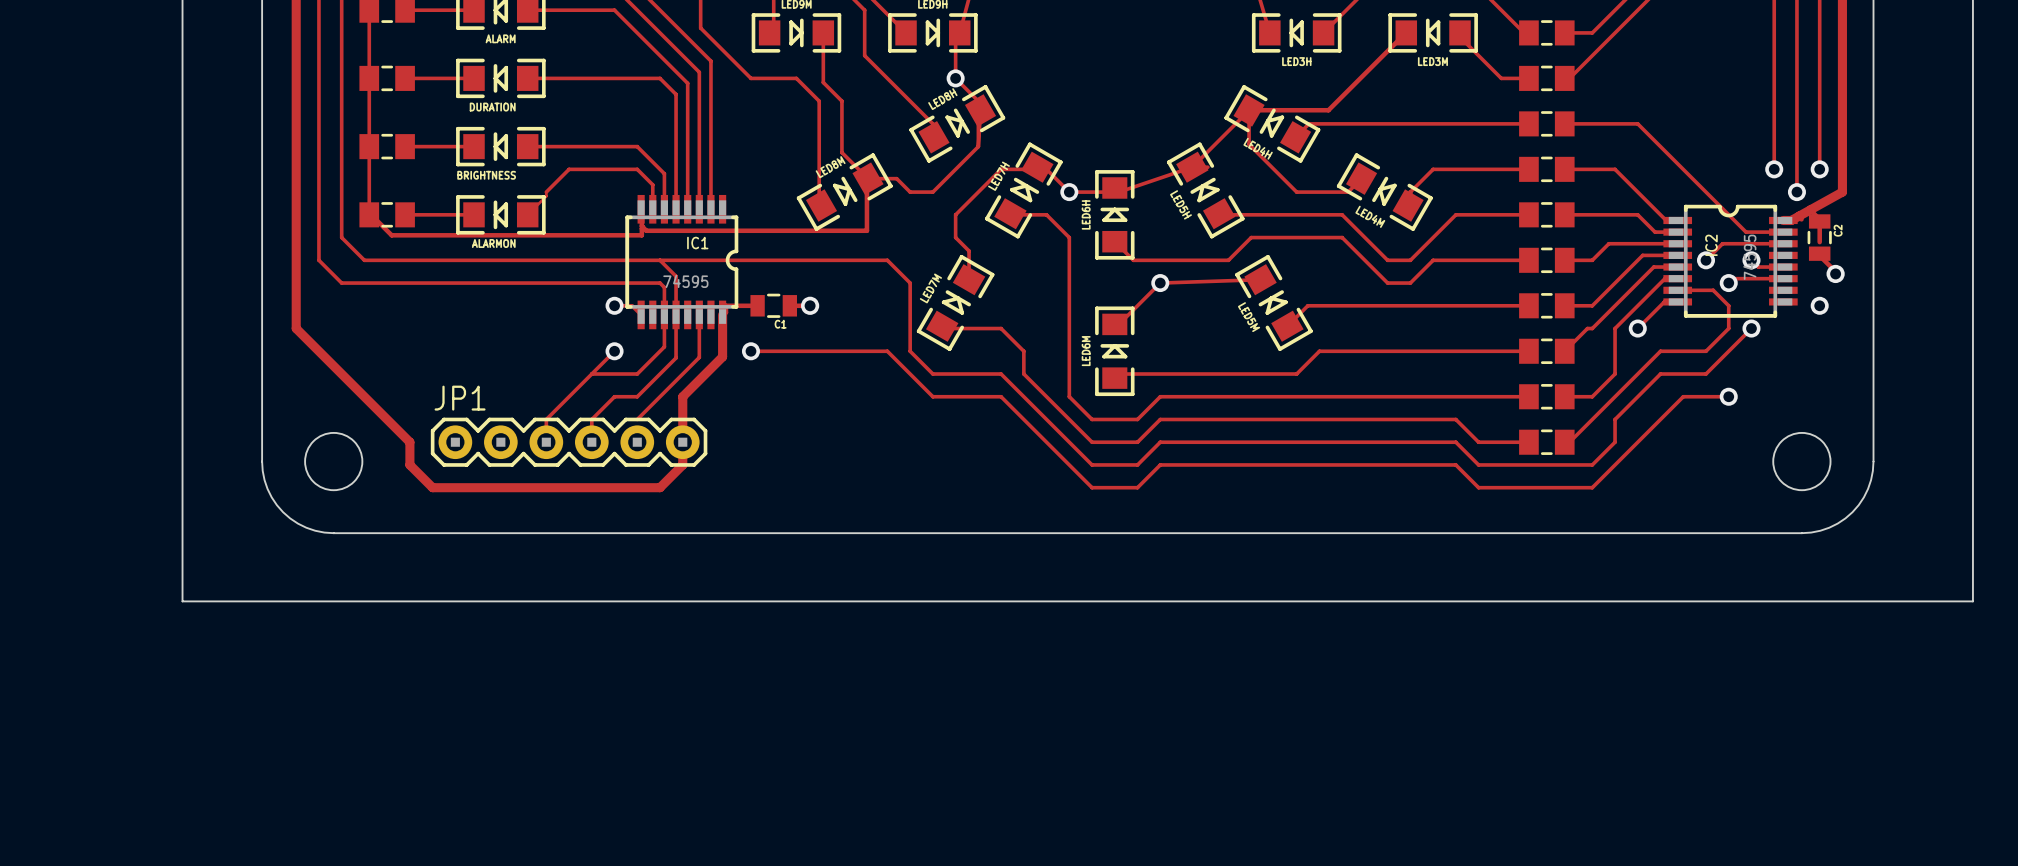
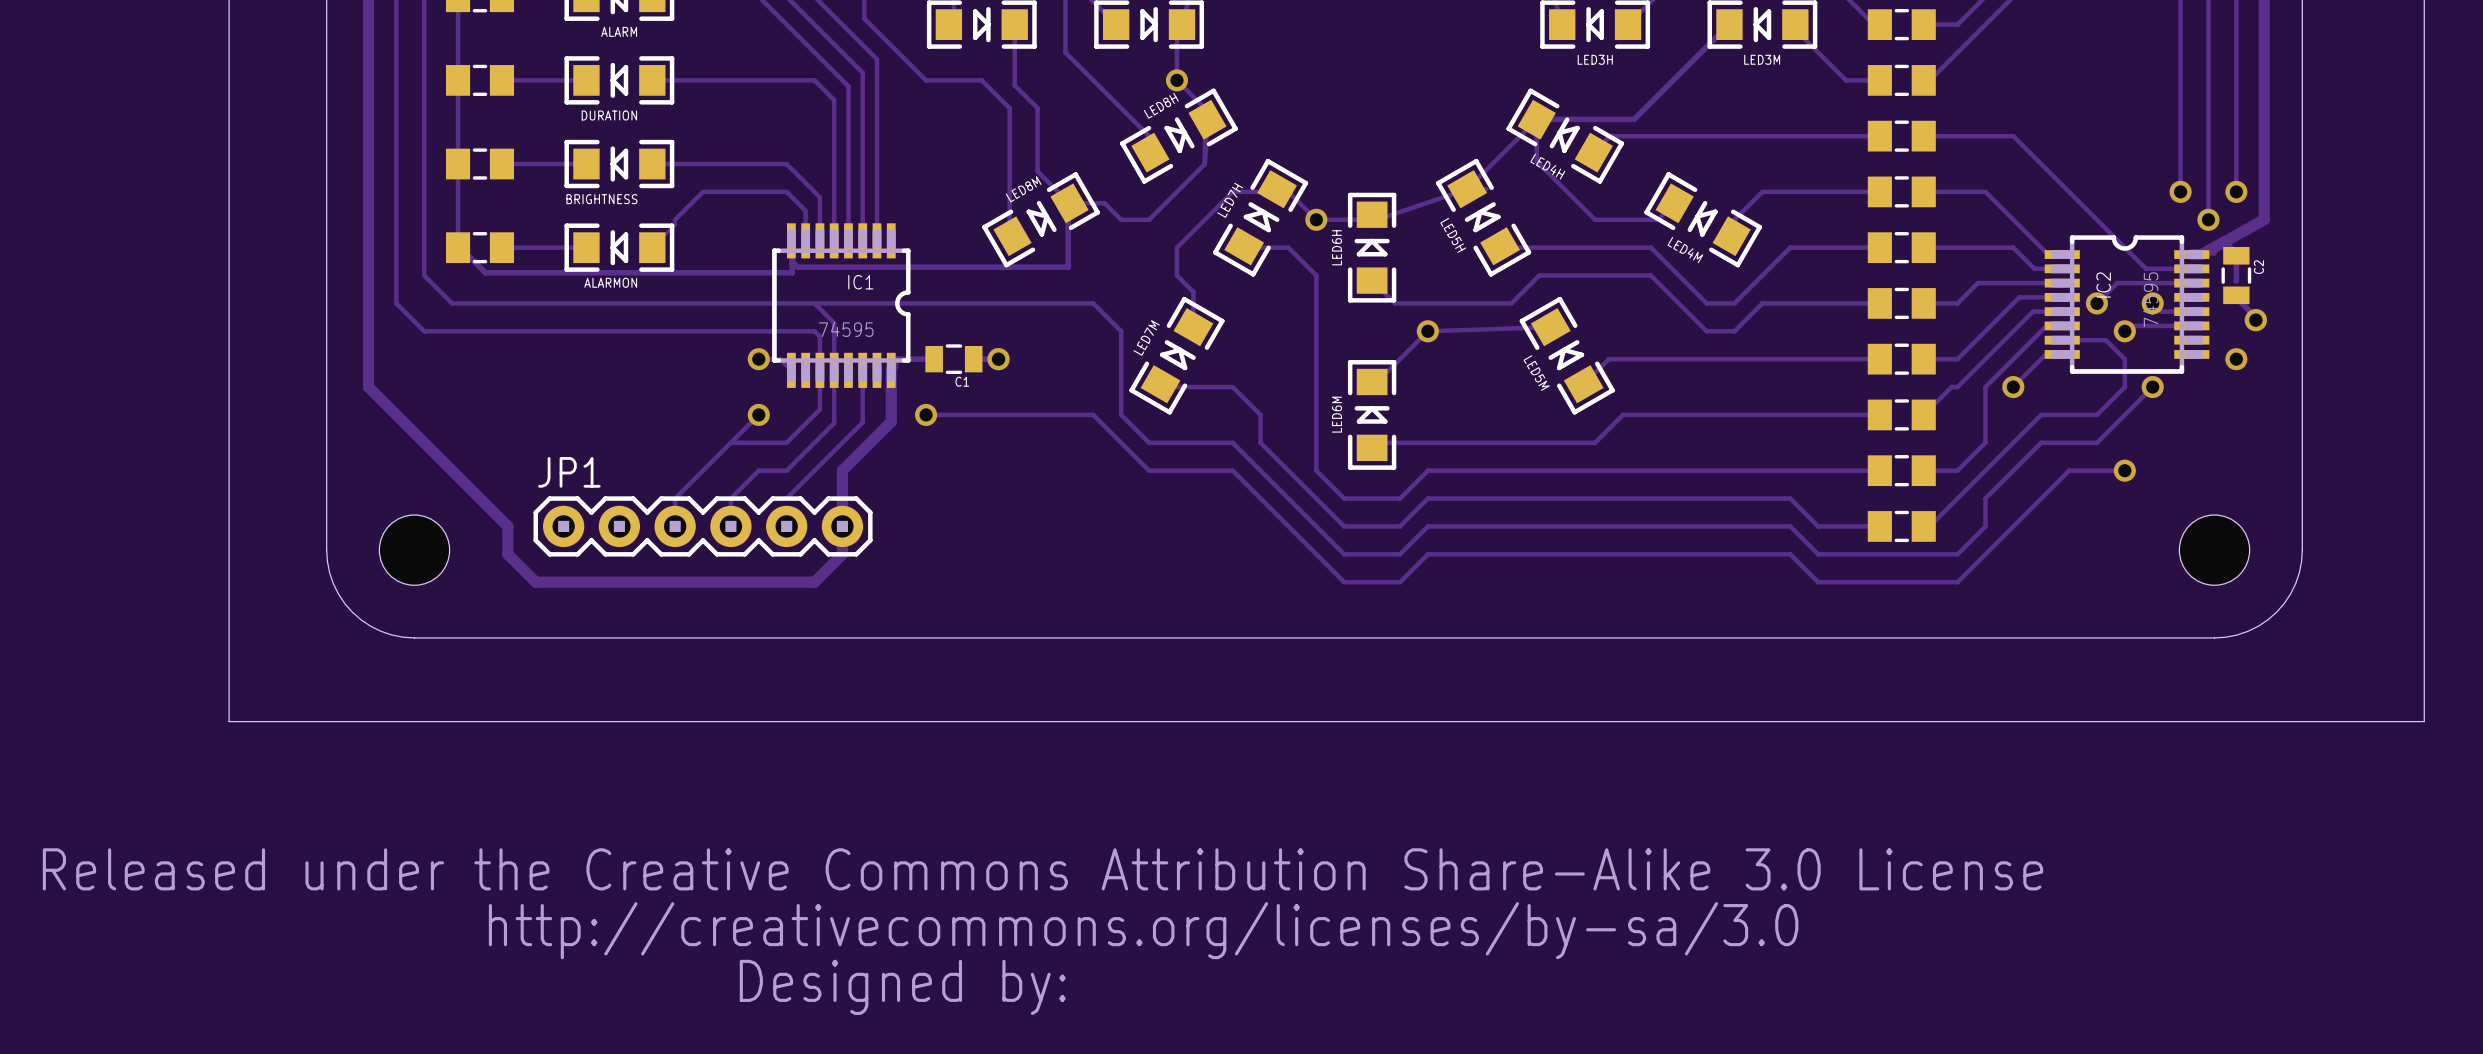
drawing: none -> [42, 848, 2044, 1015]

